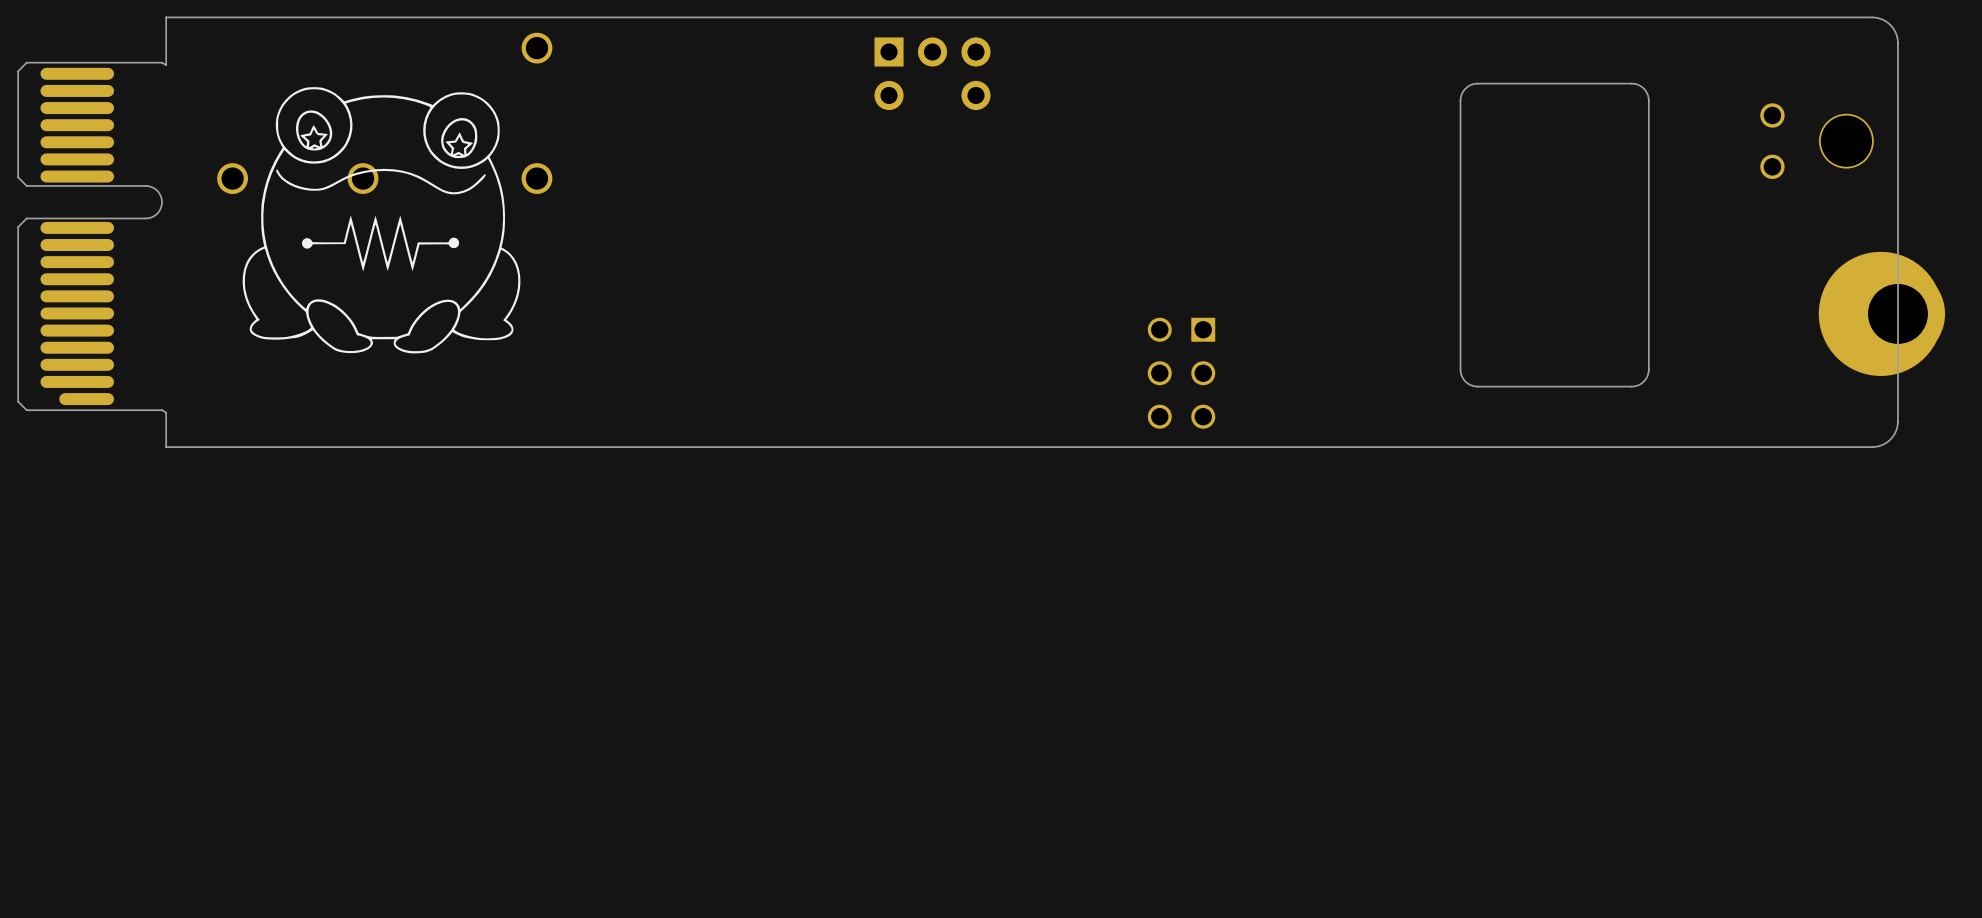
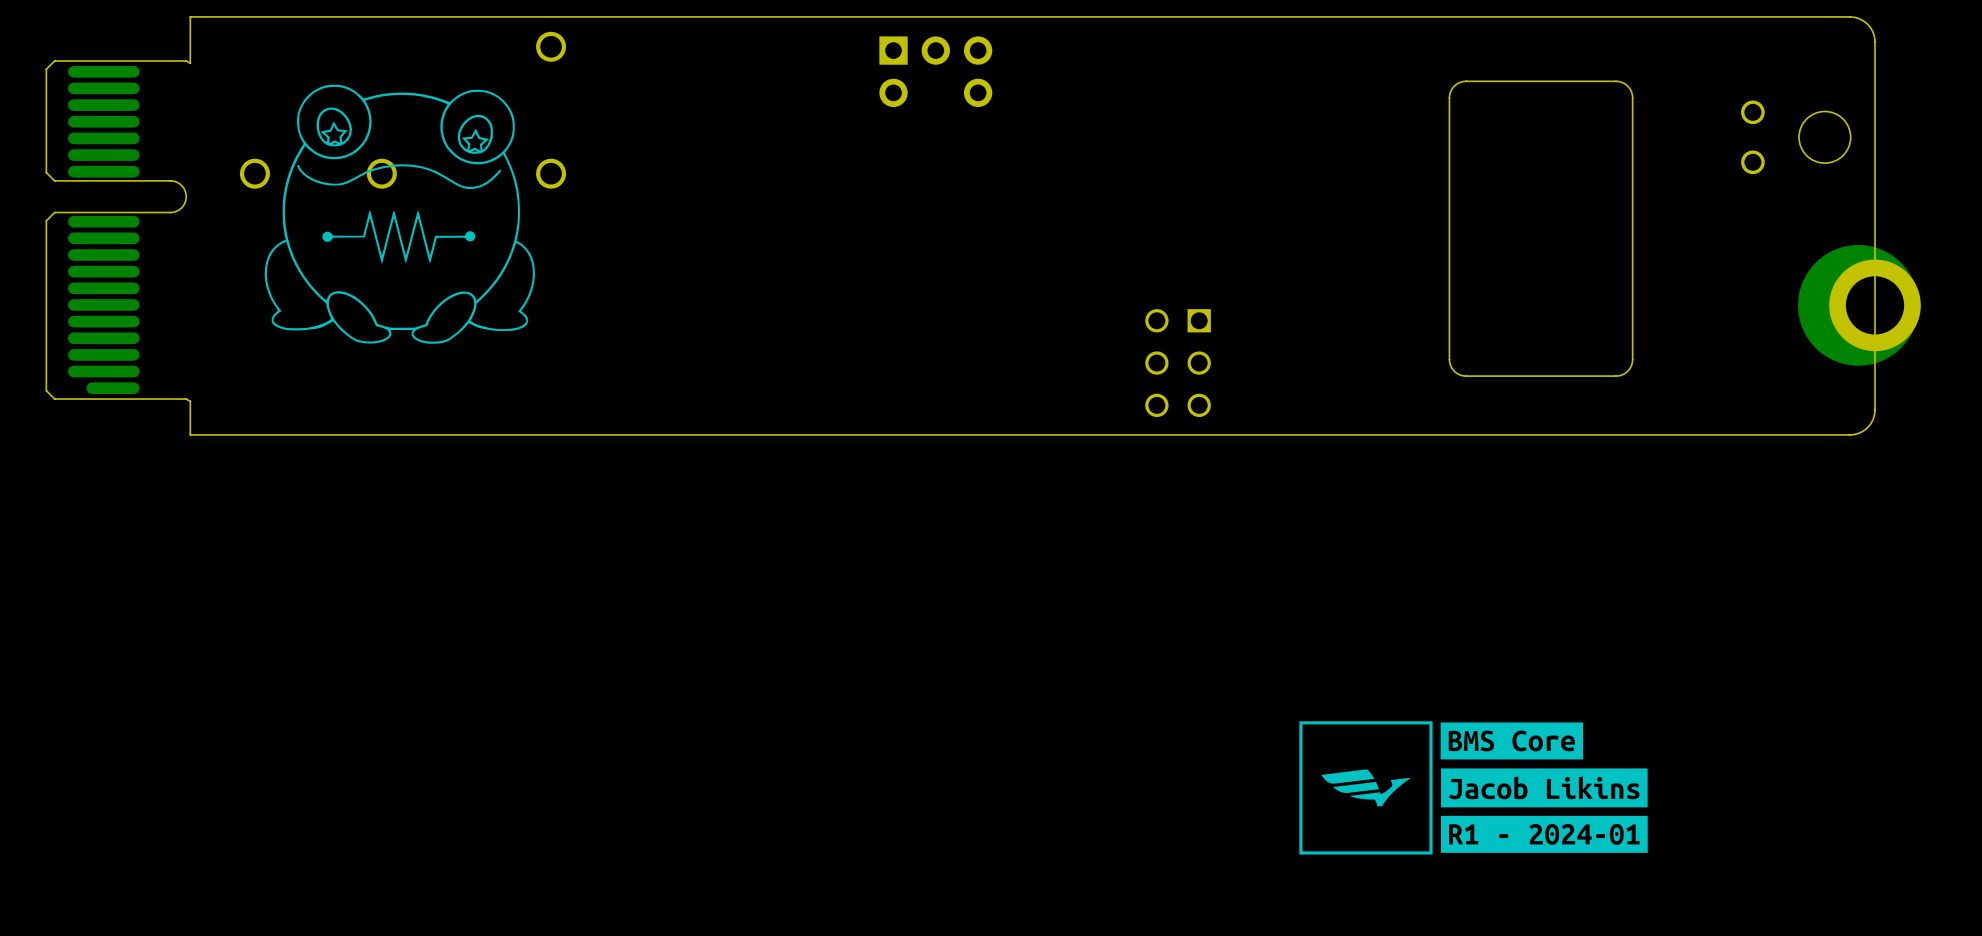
drawing: none -> [1299, 721, 1648, 855]

